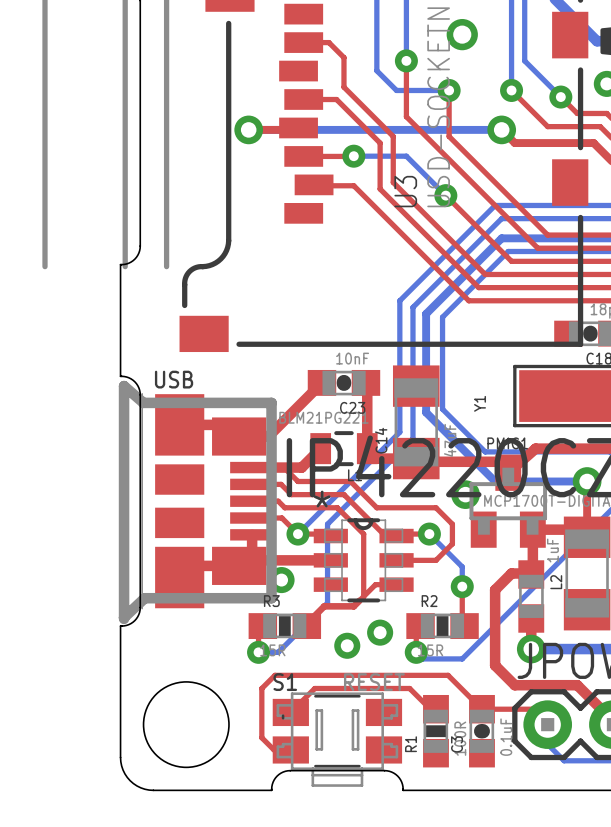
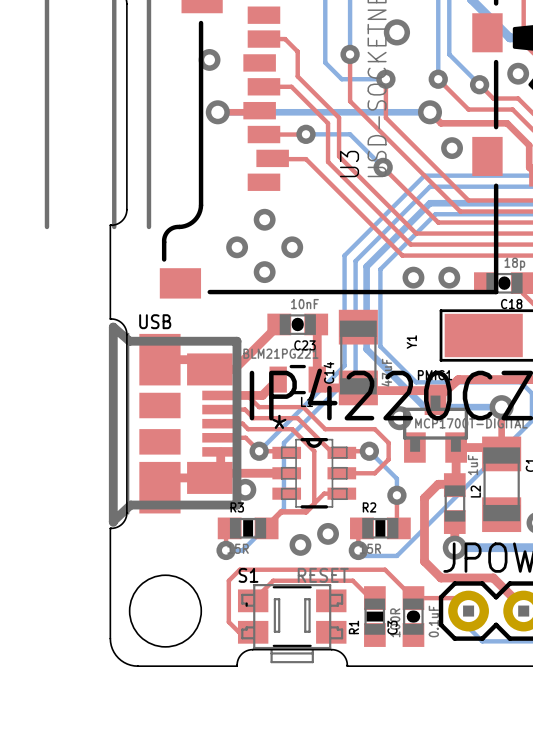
via: none -> (209, 59)
via: none -> (452, 148)
via: none -> (264, 219)
via: none -> (237, 247)
via: none -> (292, 247)
via: none -> (264, 272)
via: none -> (413, 277)
via: none -> (449, 277)

